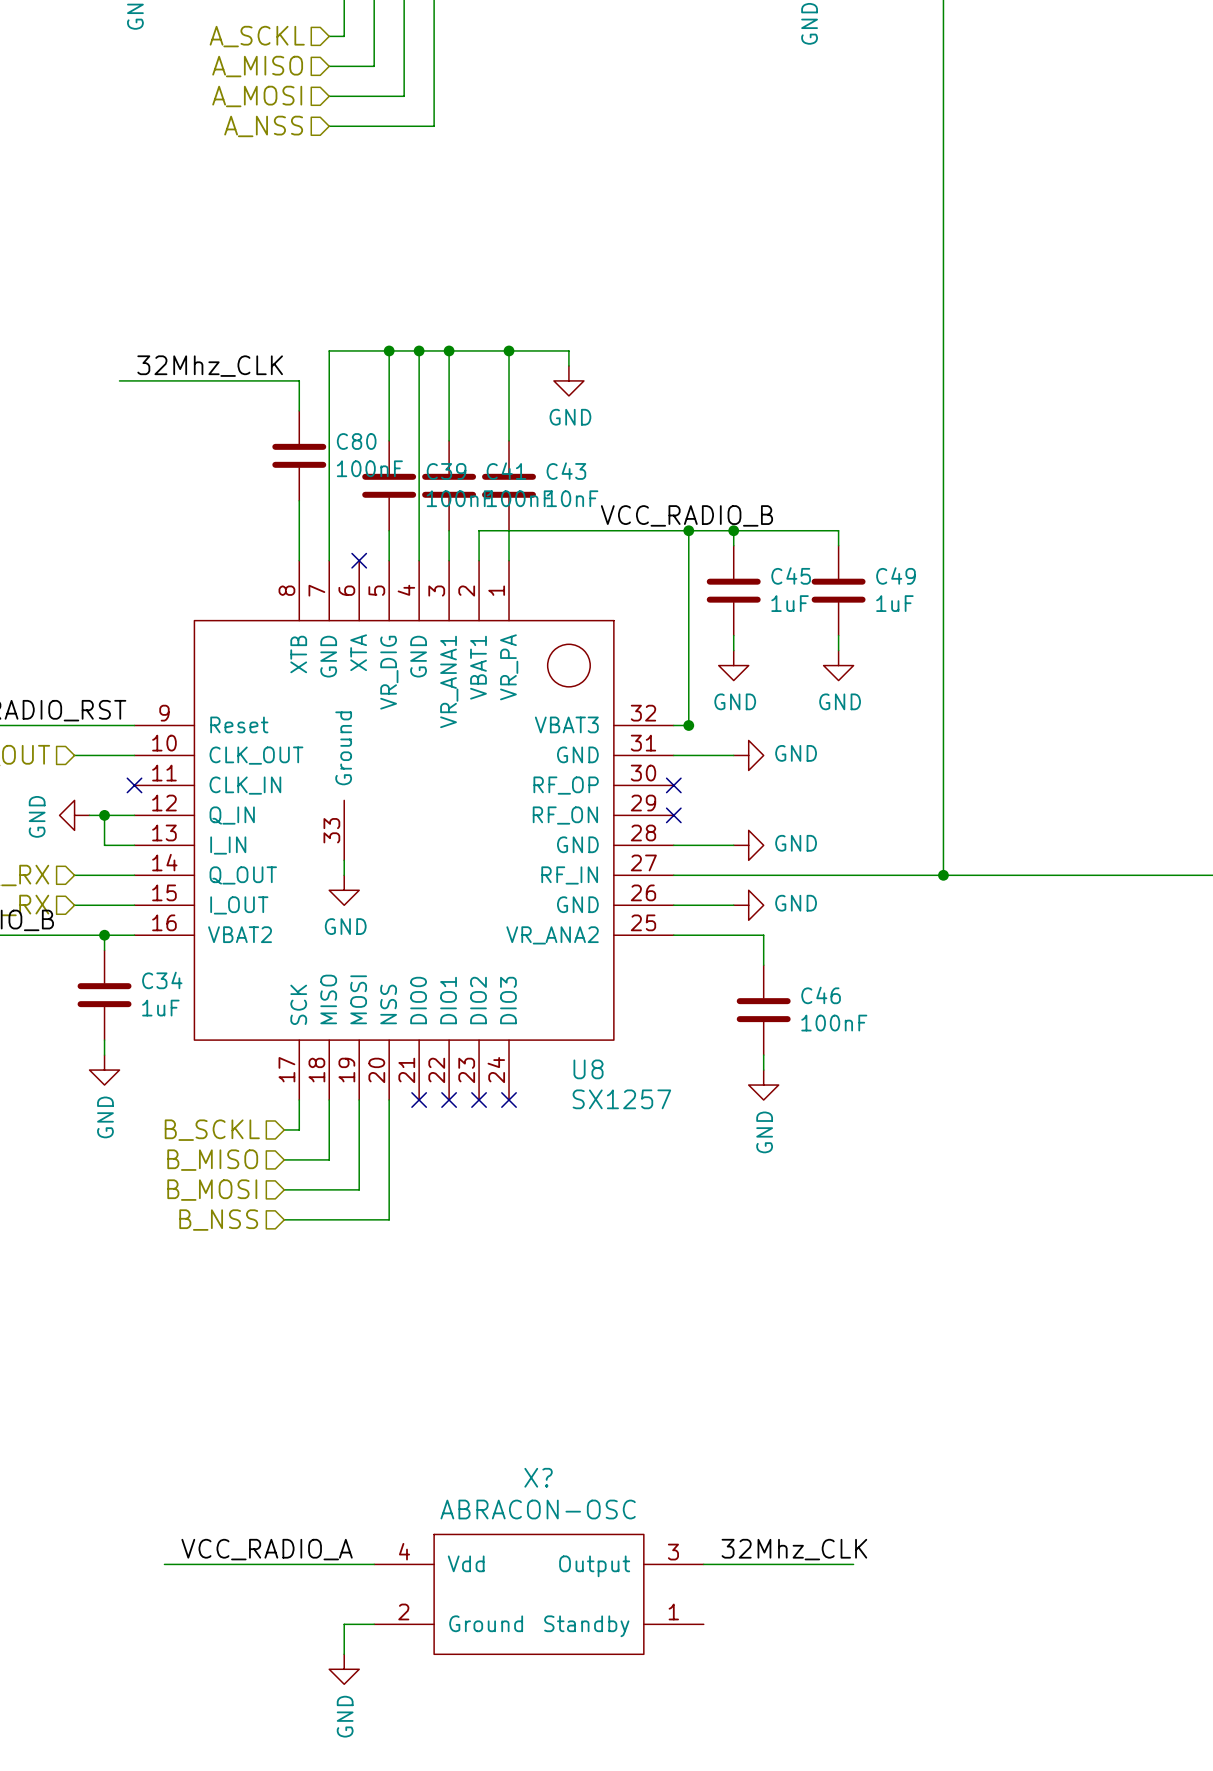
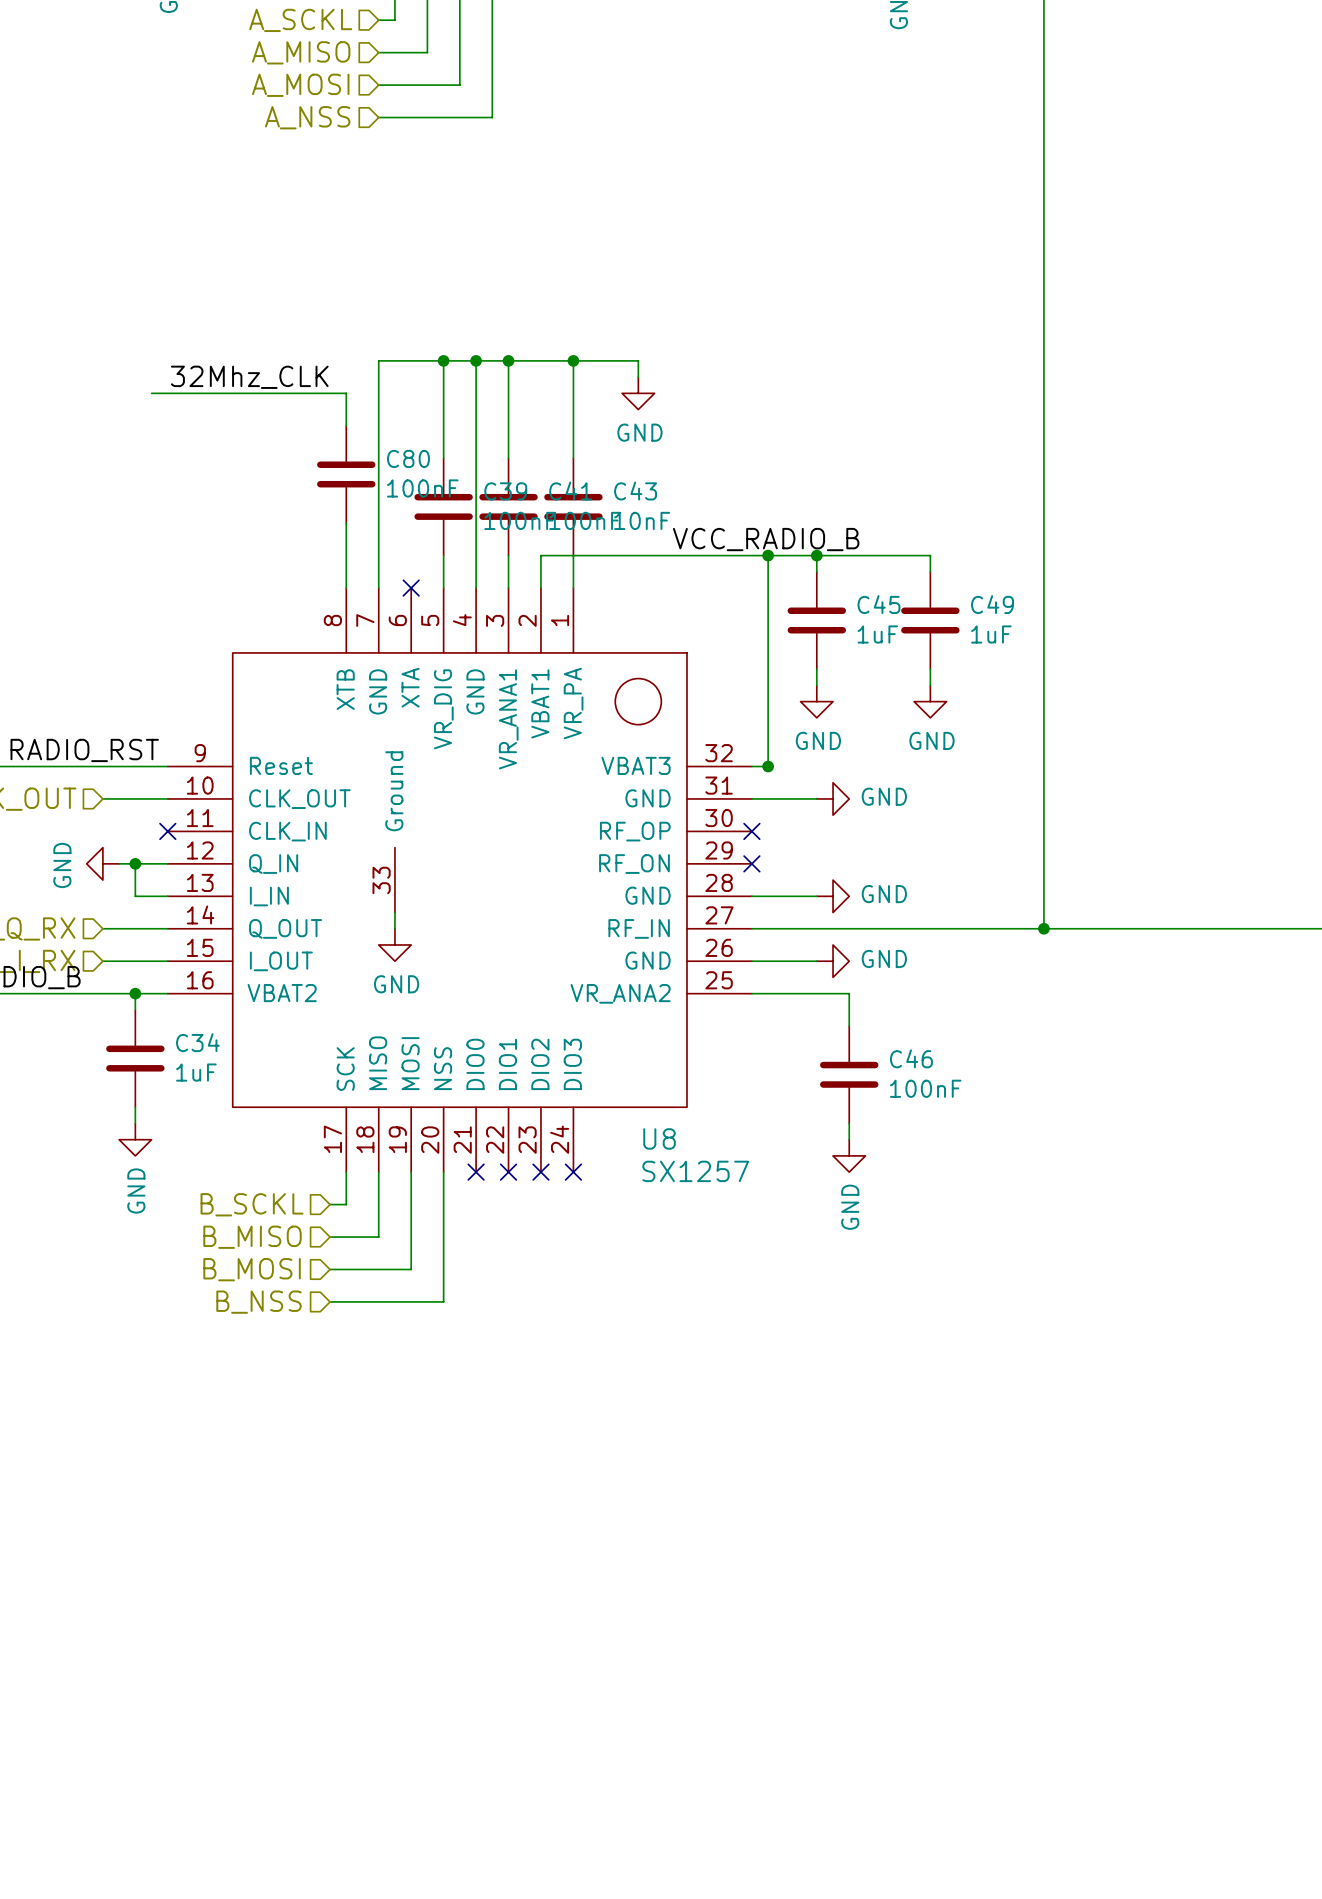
label: VCC_RADIO_A (267, 1549) -> none
label: 32Mhz_CLK (794, 1549) -> none
wire: (164, 1564) (374, 1564) -> none
wire: (703, 1564) (853, 1564) -> none
X?: ABRACON-OSC (538, 1594) -> none
wire: (374, 1624) (344, 1624) (344, 1654) -> none
power symbol: GND (344, 1669) -> none

